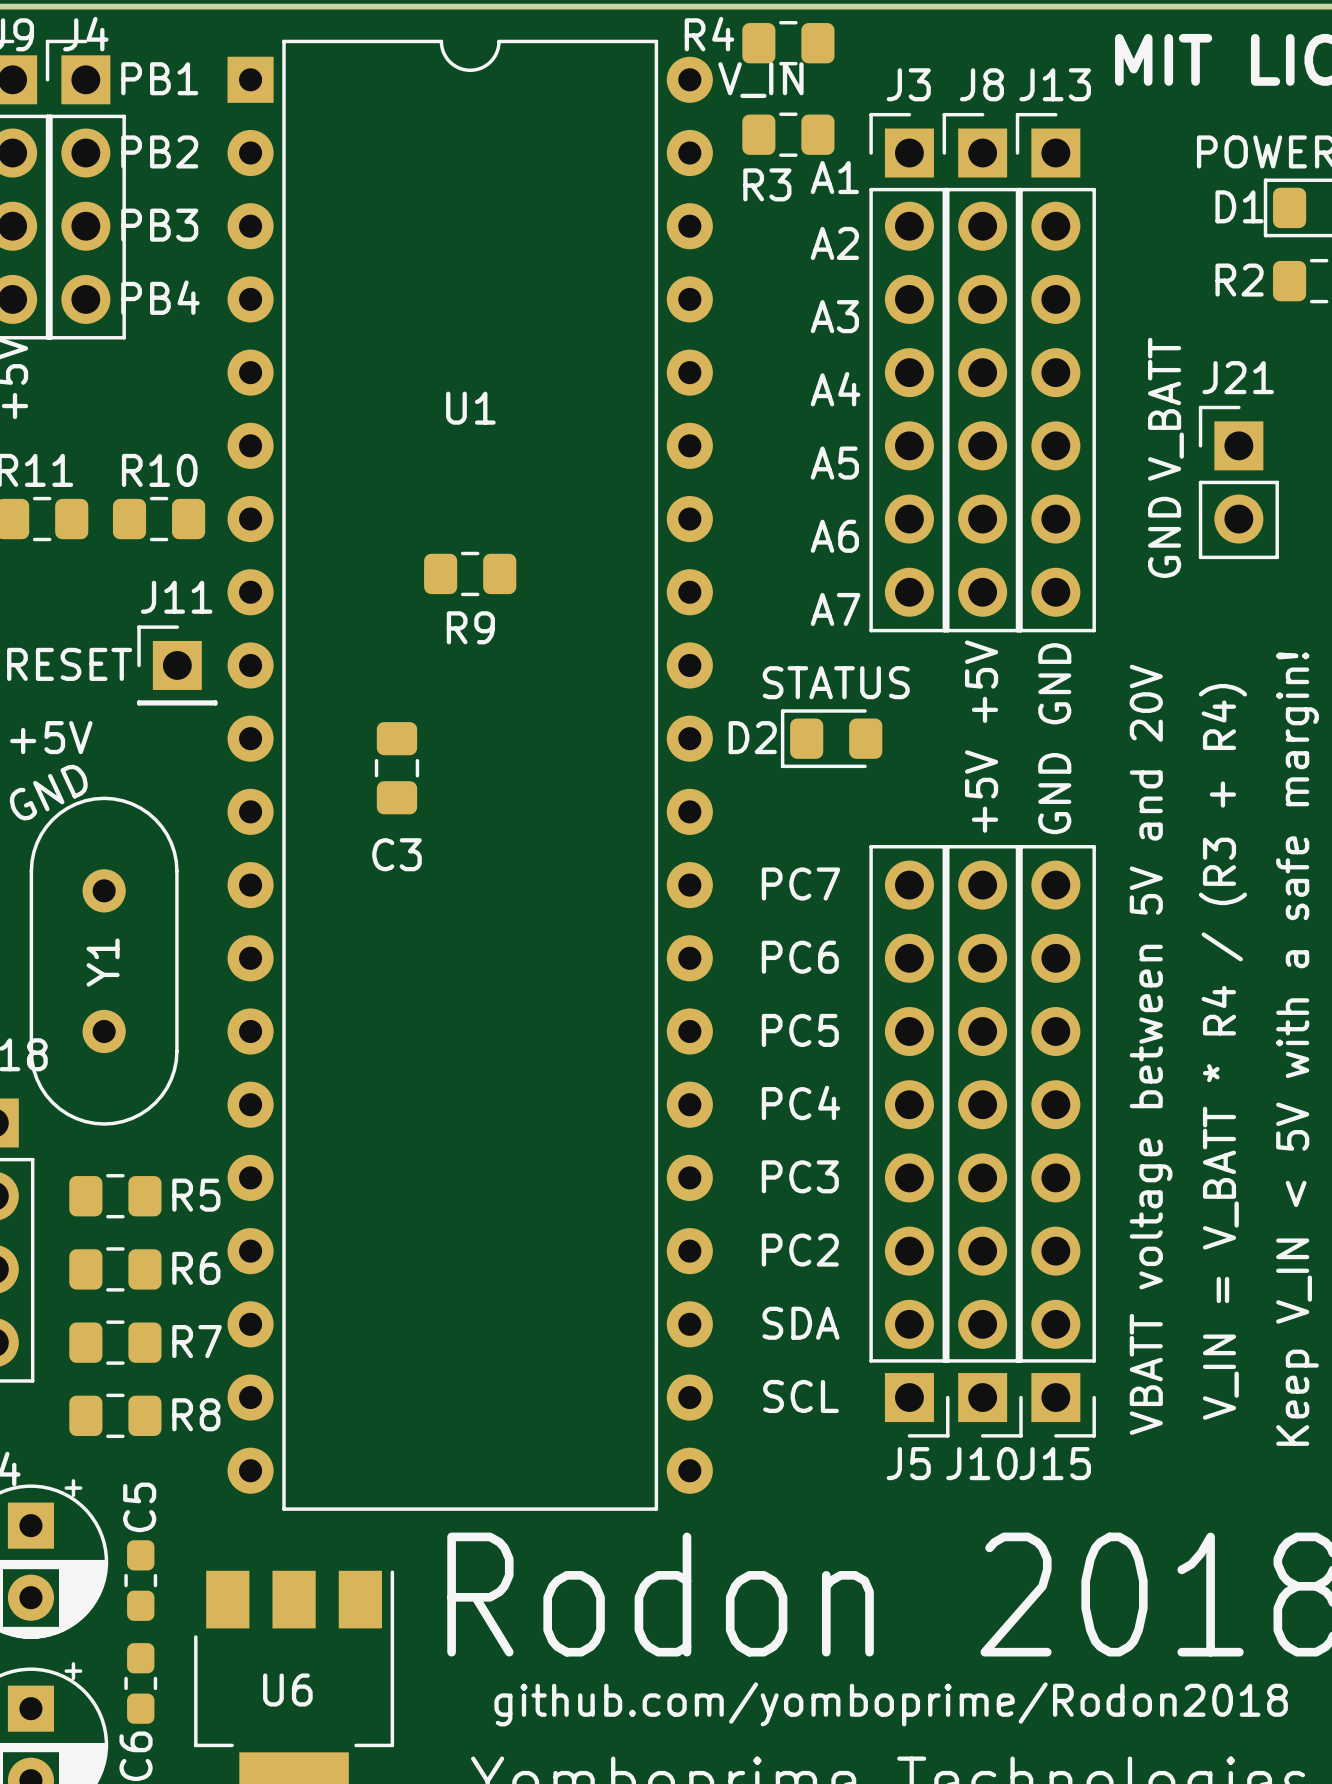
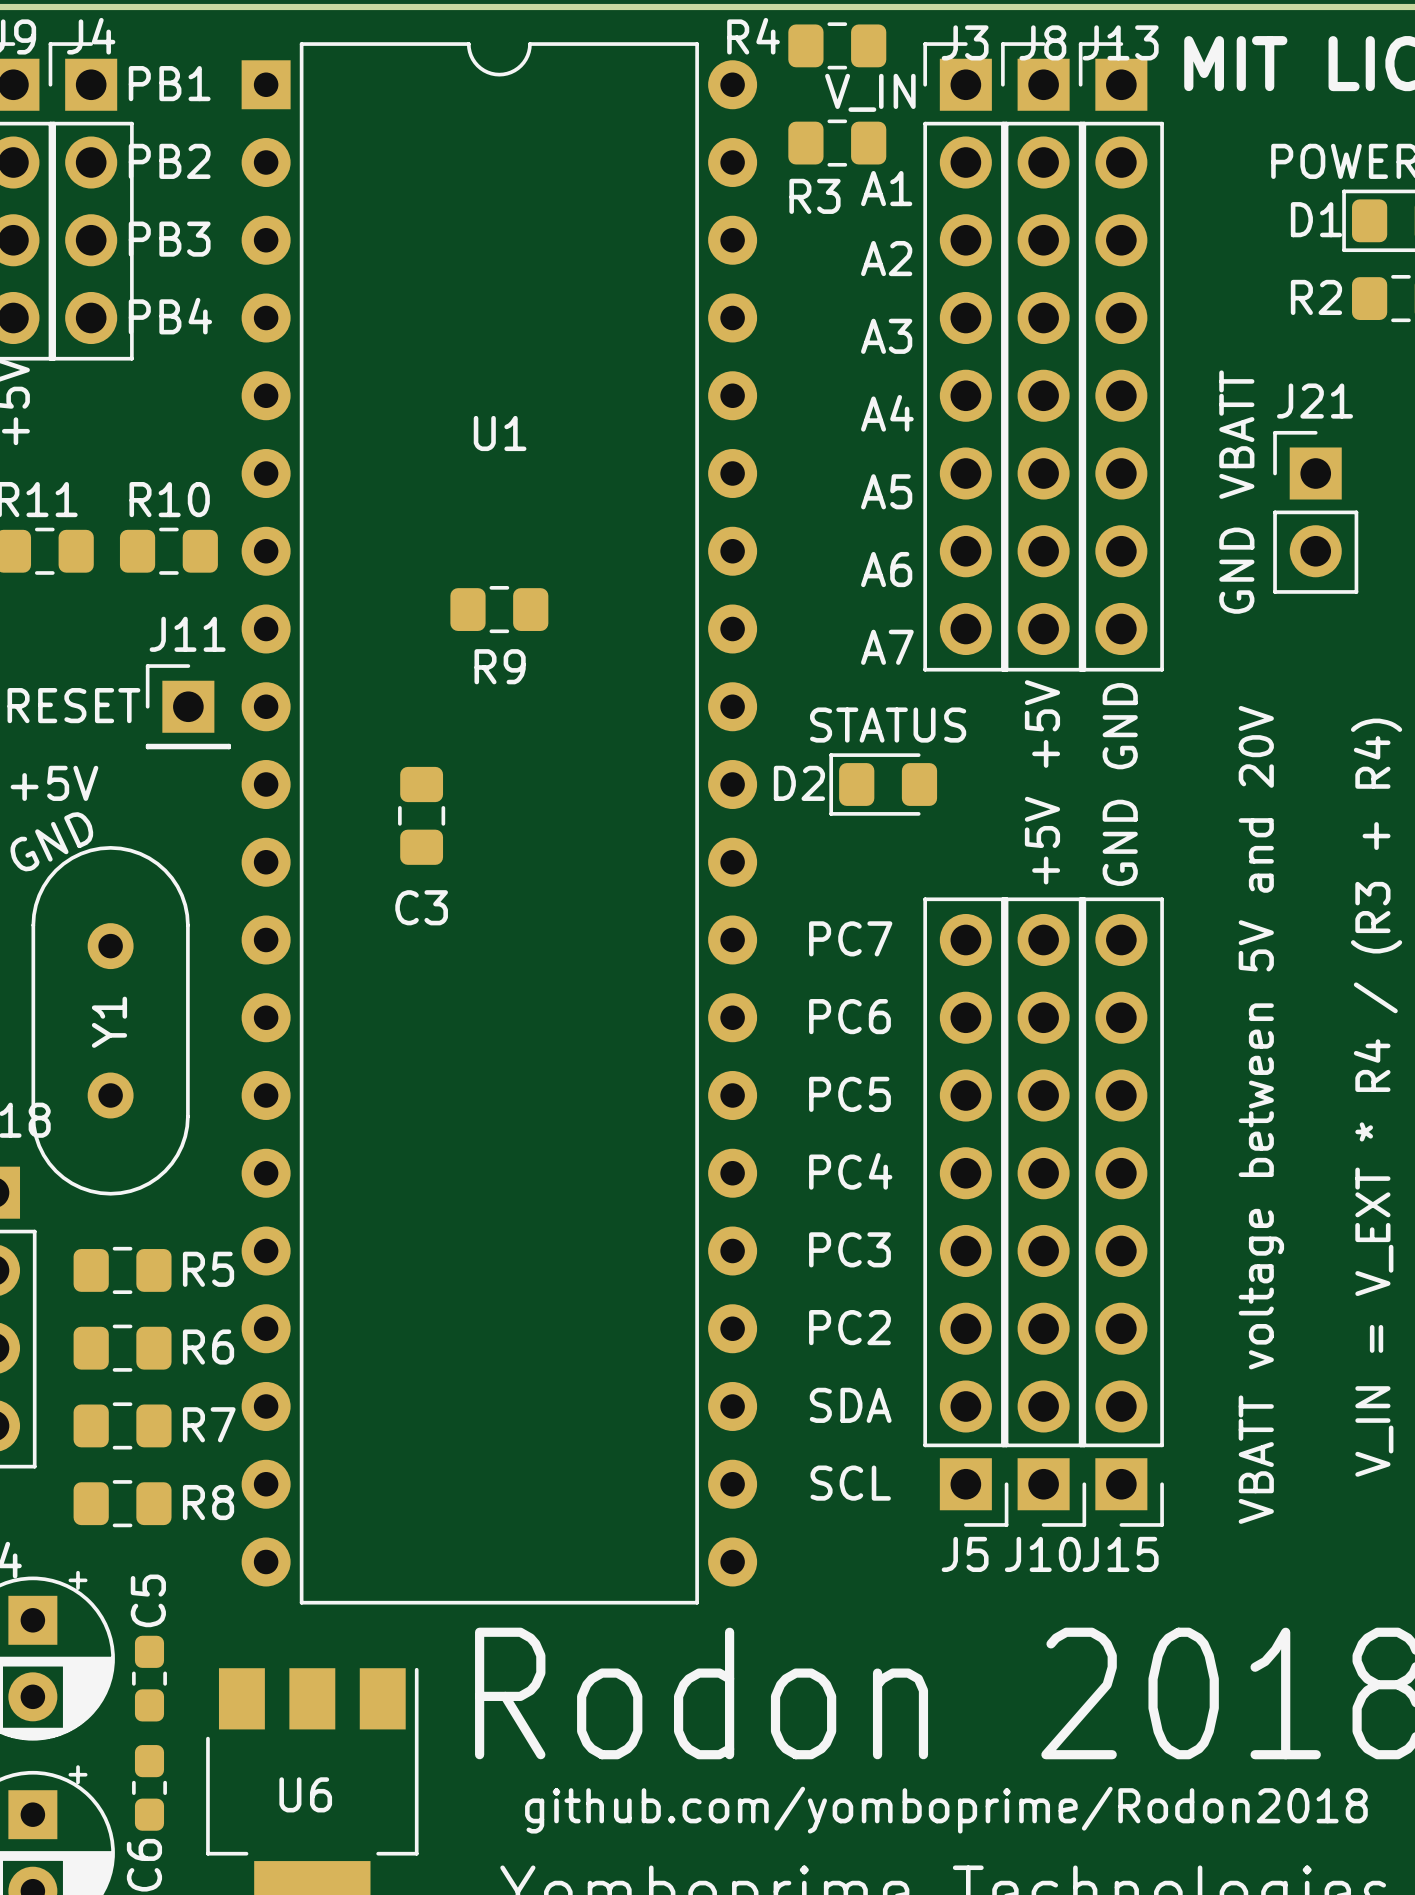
text position: V_IN (760, 80) -> V_IN (870, 92)
J3 footprint: [869, 112, 950, 633] -> [923, 42, 1009, 672]
J8 footprint: [942, 112, 1023, 633] -> [1001, 42, 1087, 672]
J13 footprint: [1015, 112, 1096, 633] -> [1078, 42, 1164, 672]
text: V_BATT (1165, 409) -> VBATT (1236, 434)
text position: VBATT voltage between 5V and 20V (1151, 1049) -> VBATT voltage between 5V and 20V (1261, 1114)
text: Keep V_IN < 5V with a safe margin! (1297, 1049) -> V_IN = V_EXT * R4 / (R3 + R4) (1376, 1097)
text: V_IN = V_BATT * R4 / (R3 + R4) (1222, 1051) -> none

